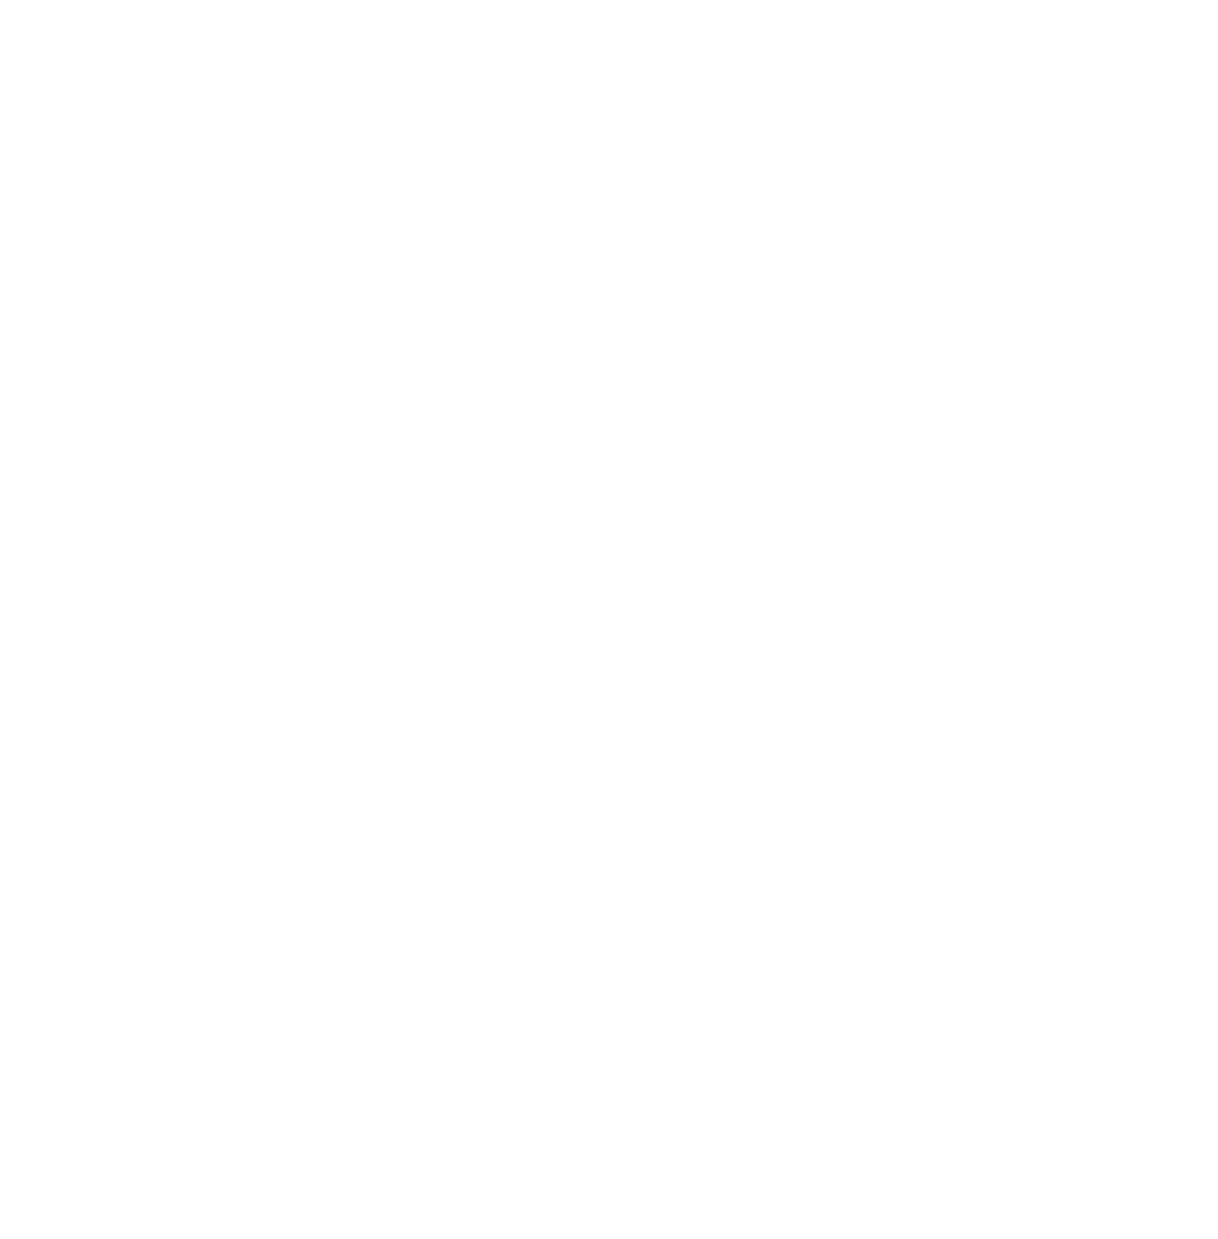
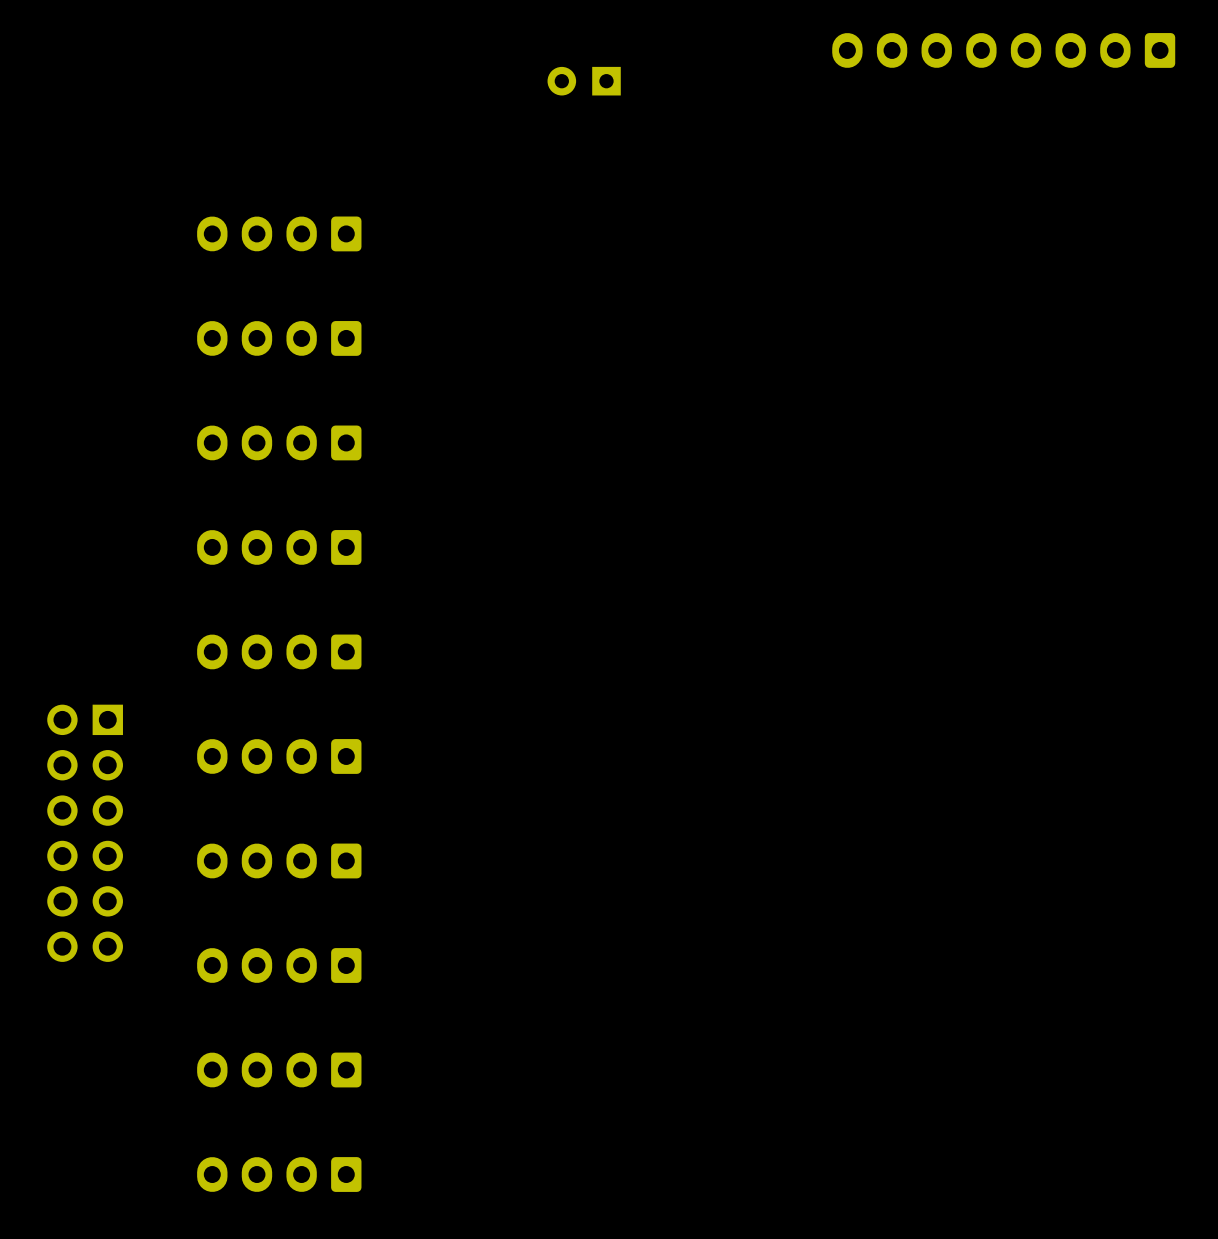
part: none -> (1003, 50)
part: none -> (584, 81)
part: none -> (279, 233)
part: none -> (279, 338)
part: none -> (279, 442)
part: none -> (279, 547)
part: none -> (279, 651)
part: none -> (279, 756)
part: none -> (85, 833)
part: none -> (279, 860)
part: none -> (279, 965)
part: none -> (279, 1070)
part: none -> (279, 1174)

